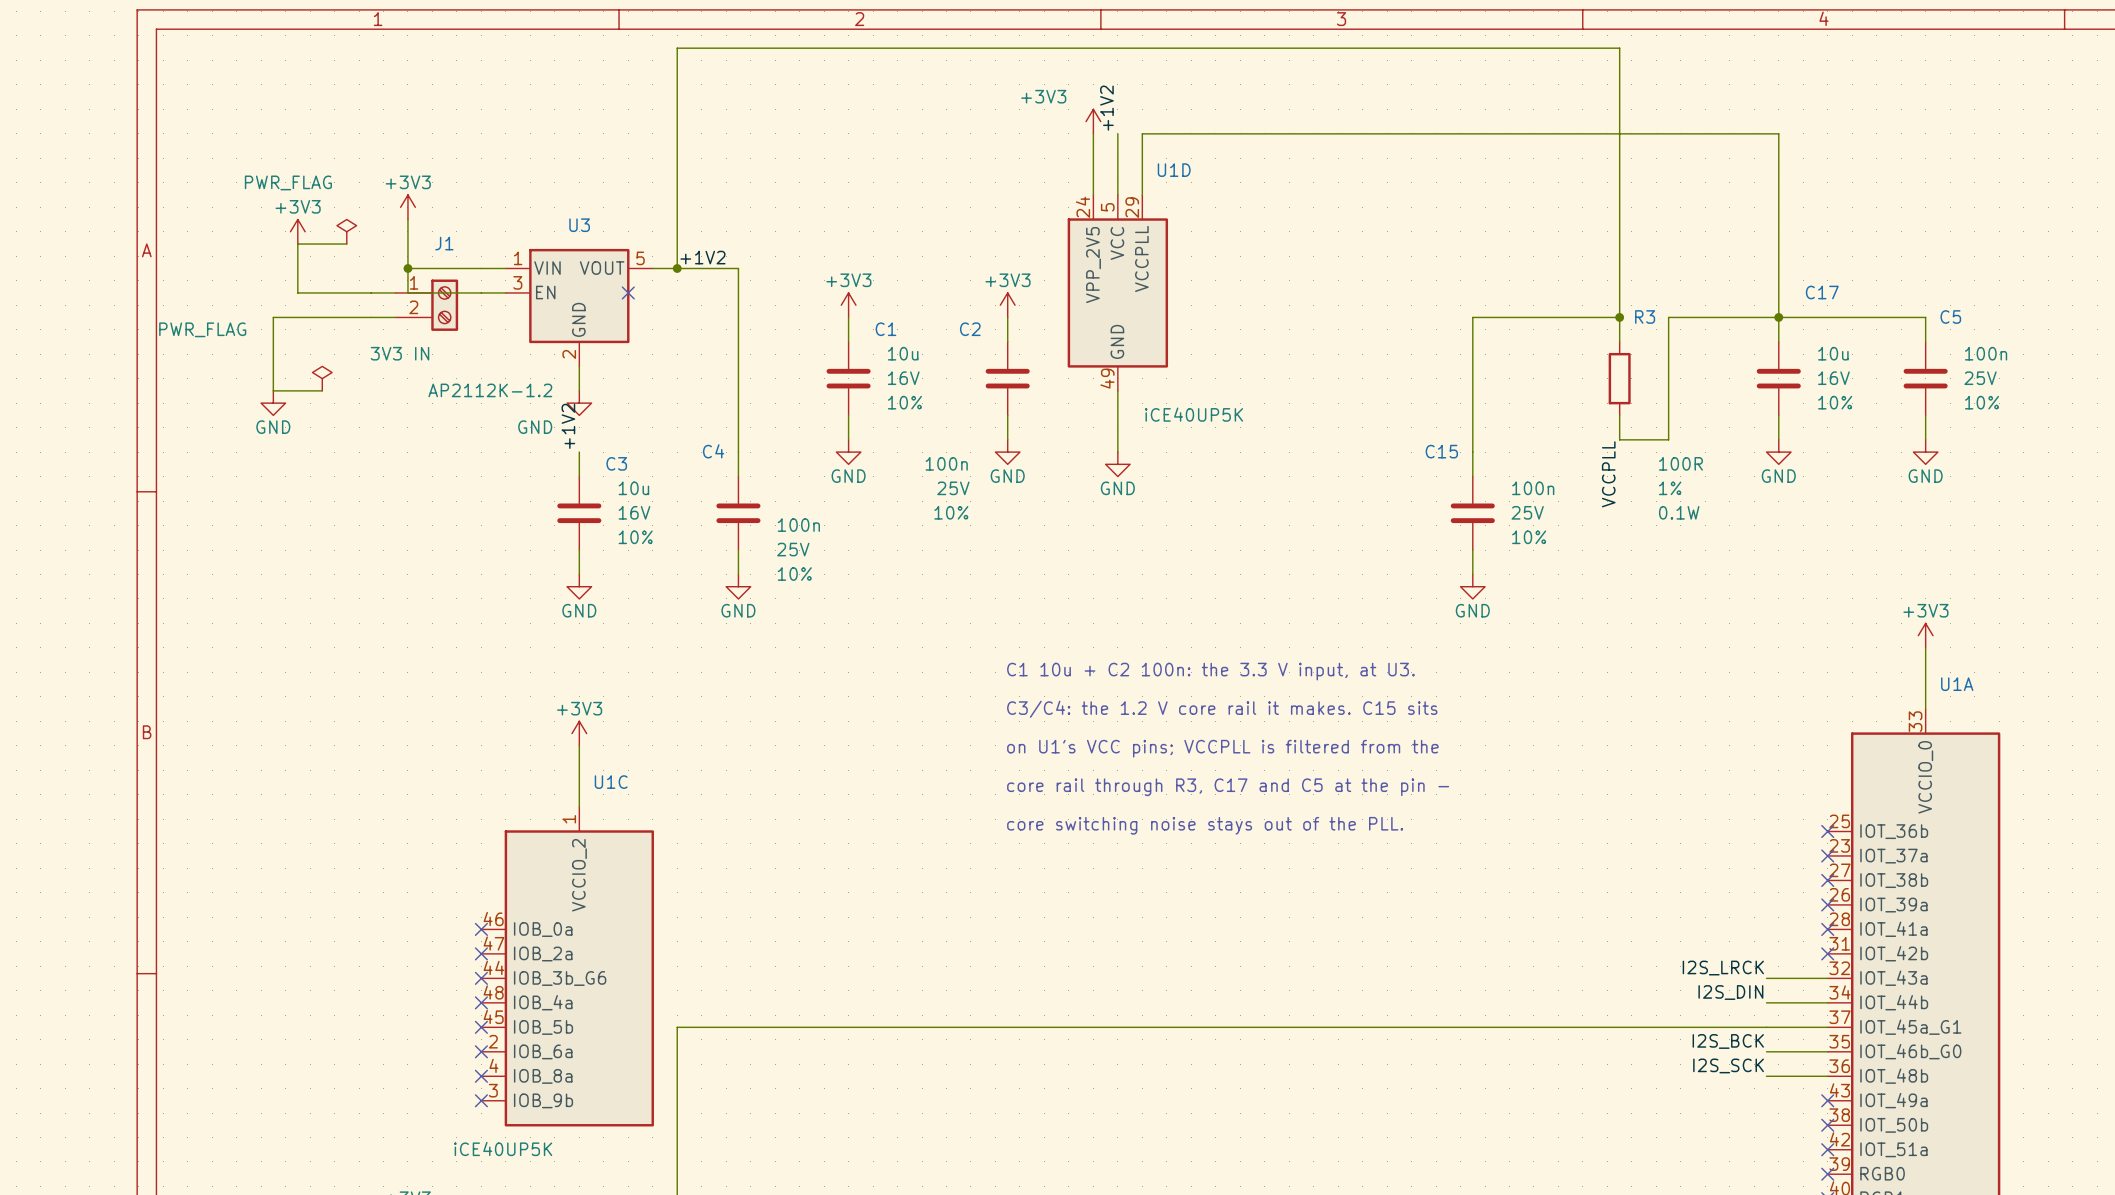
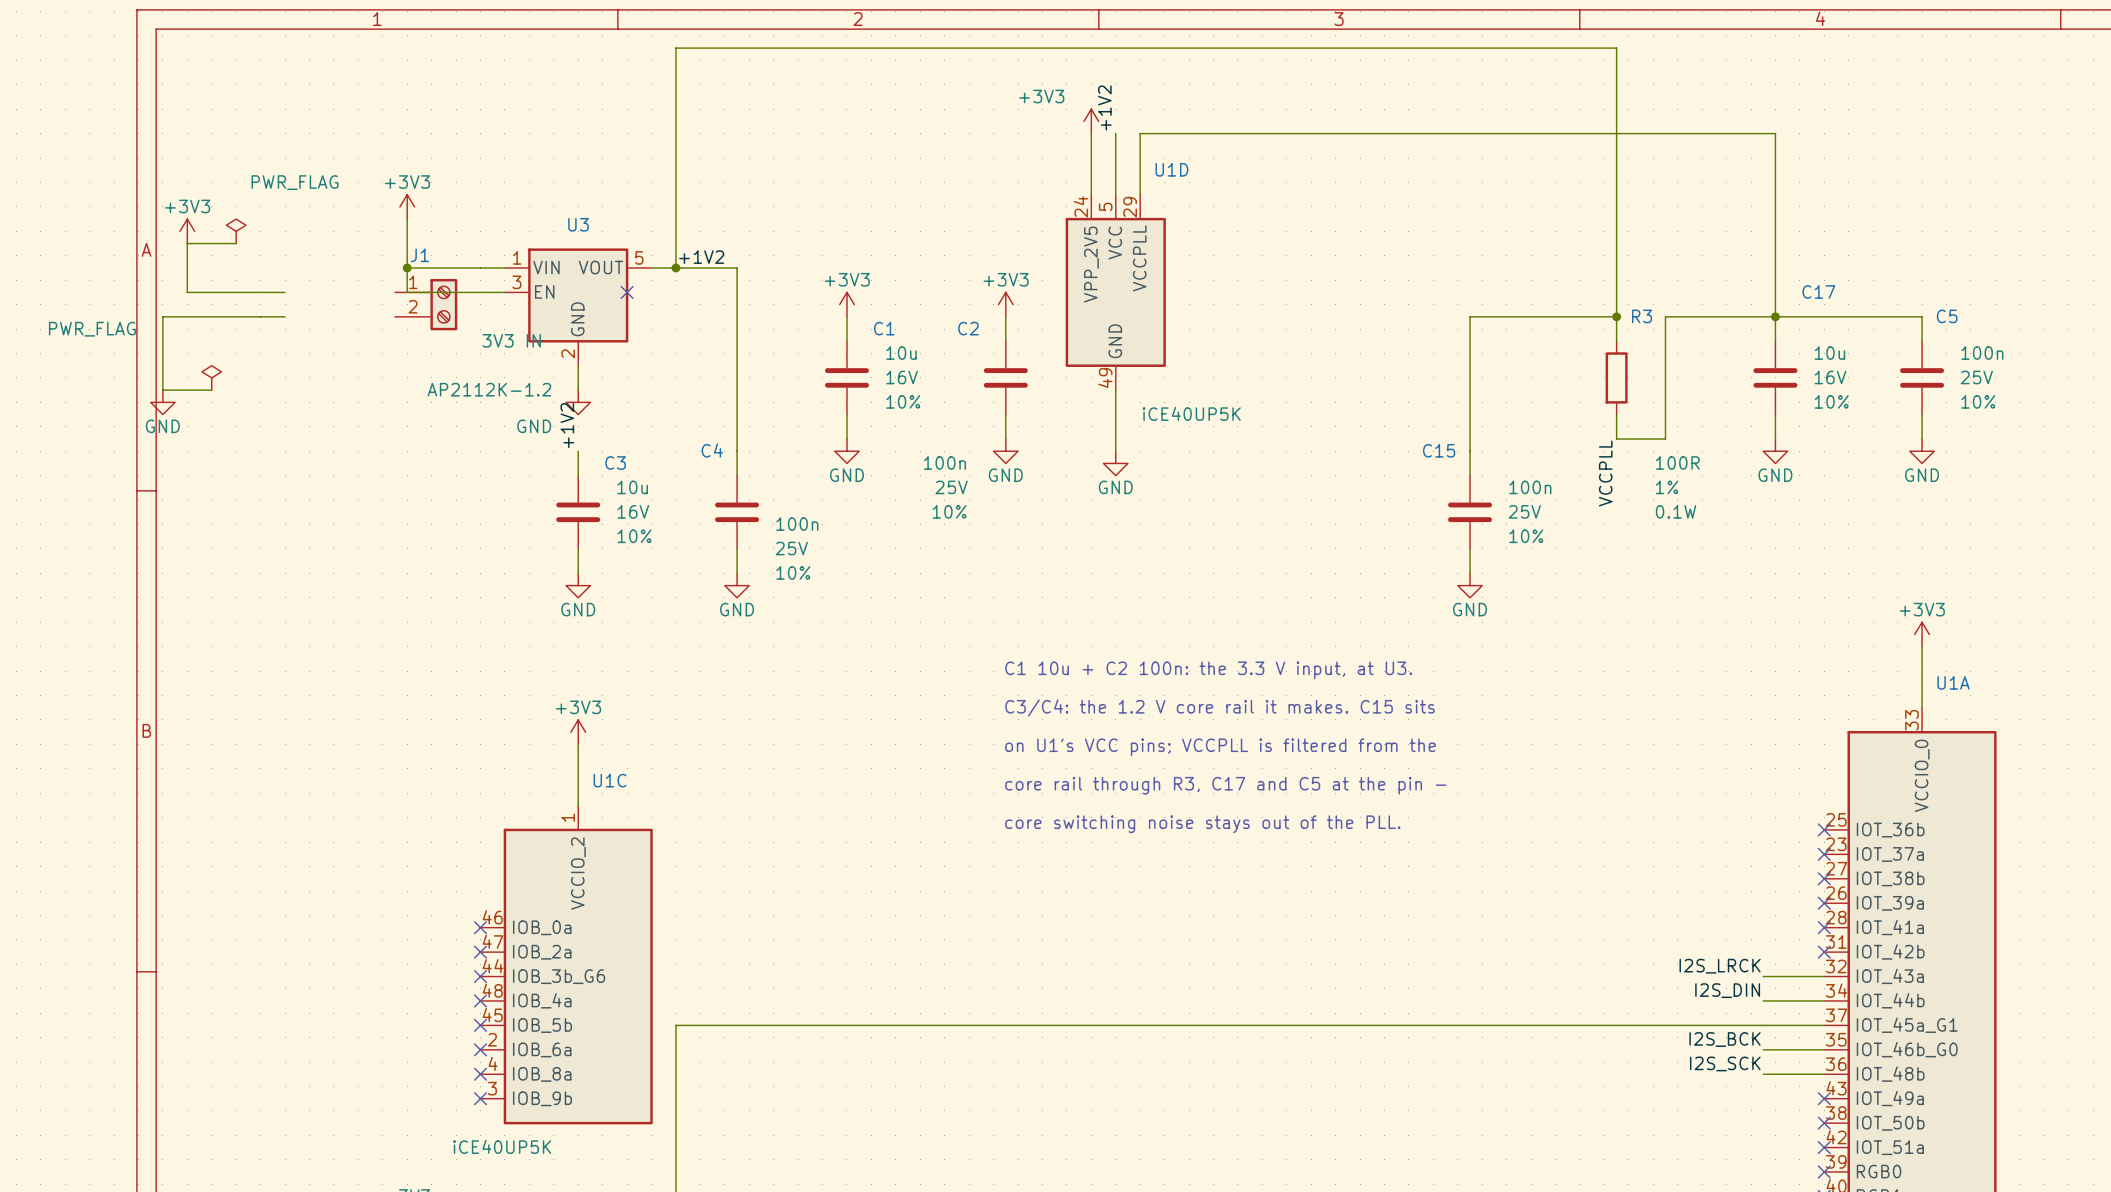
power symbol: none -> PWR_FLAG (236, 231)
power symbol position: +3V3 (297, 231) -> +3V3 (187, 231)
power symbol: PWR_FLAG (346, 231) -> none
J1 name position: J1 (444, 243) -> J1 (419, 255)
wire: (346, 244) (297, 244) (297, 292) (395, 292) -> (236, 243) (187, 243) (187, 292) (285, 292)
wire: (273, 317) (273, 390) (322, 390) -> (272, 316) (162, 316) (162, 390) (211, 390)
wire: (285, 317) (395, 317) -> none
J1 value position: 3V3 IN (400, 353) -> 3V3 IN (511, 340)
power symbol: none -> PWR_FLAG (211, 377)
power symbol: PWR_FLAG (322, 378) -> none
power symbol position: GND (273, 403) -> GND (162, 402)

